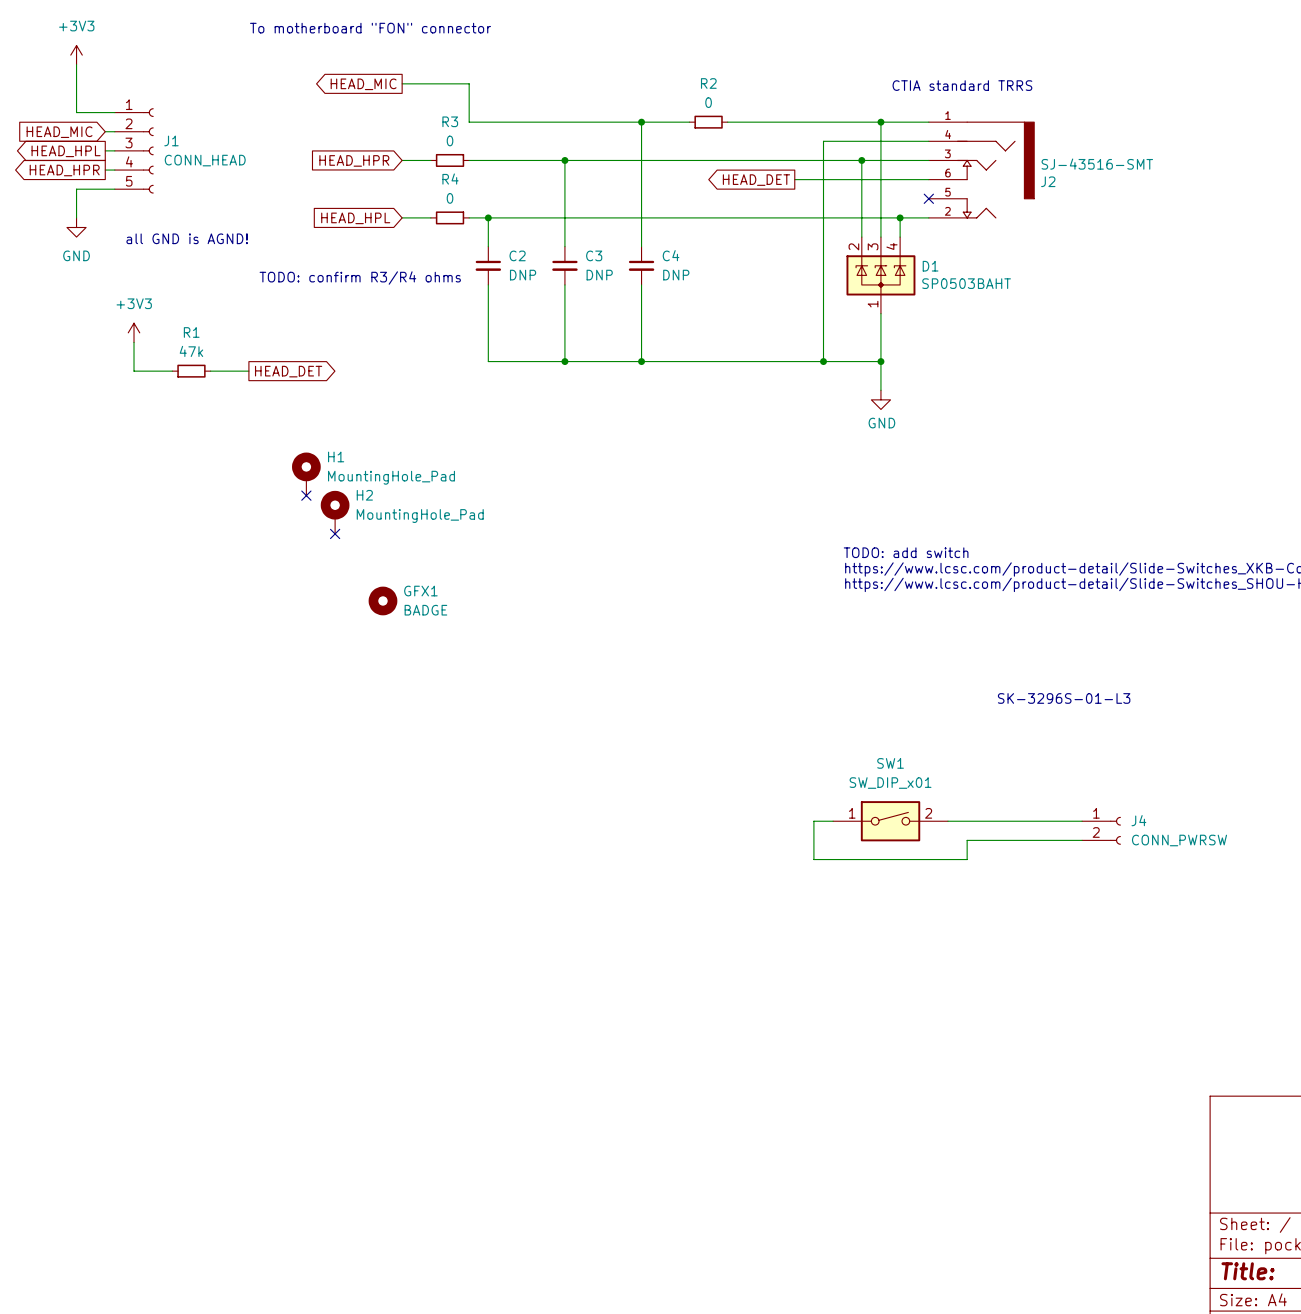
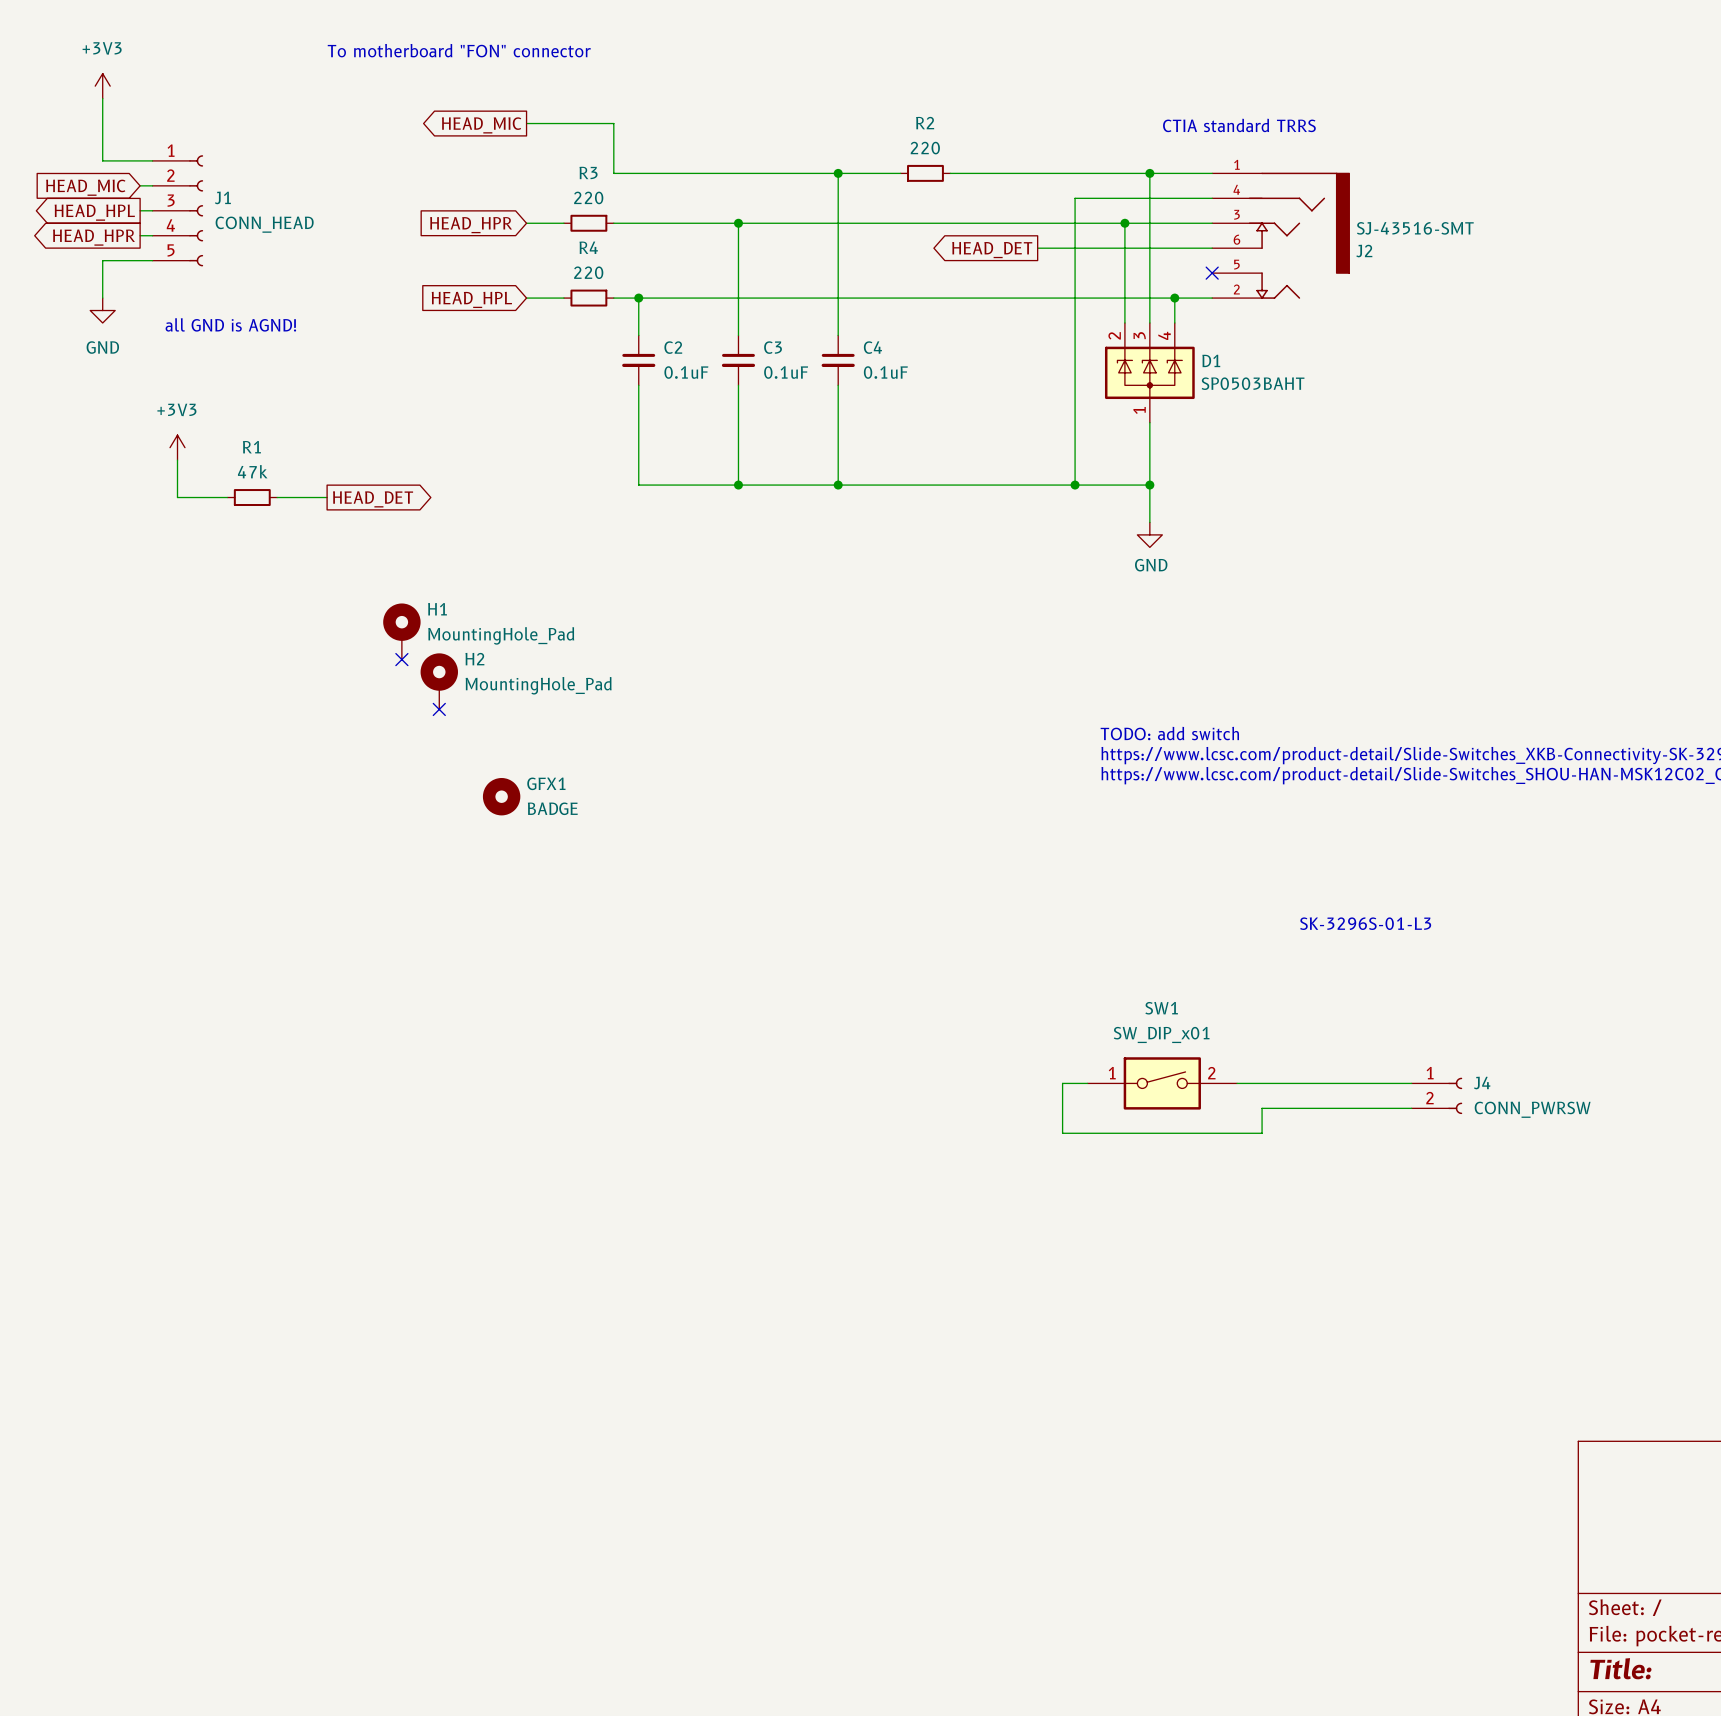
R2 value: 0 (708, 102) -> 220 (925, 148)
R3 value: 0 (450, 140) -> 220 (588, 197)
R4 value: 0 (450, 198) -> 220 (588, 272)
C2 value: DNP (523, 275) -> 0.1uF (686, 372)
C3 value: DNP (599, 275) -> 0.1uF (786, 372)
C4 value: DNP (676, 275) -> 0.1uF (885, 372)
text: TODO: confirm R3/R4 ohms (360, 278) -> none

